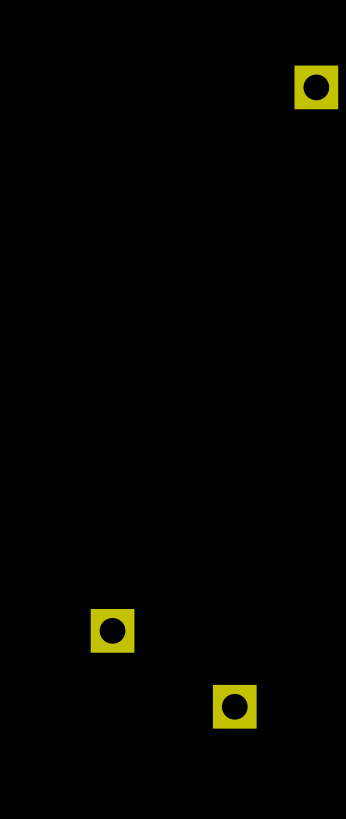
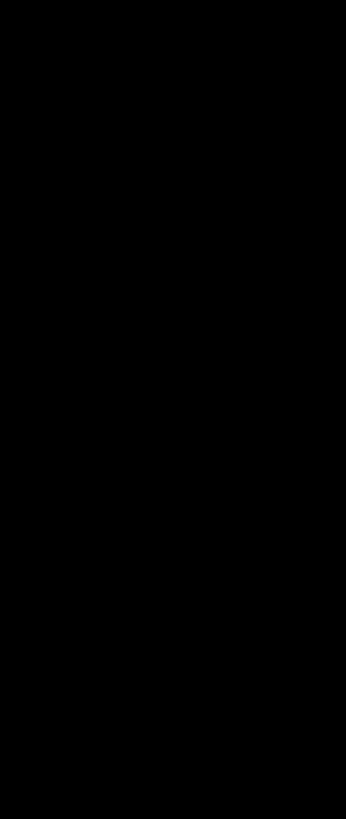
part: (316, 87) -> none
part: (112, 630) -> none
part: (234, 706) -> none

